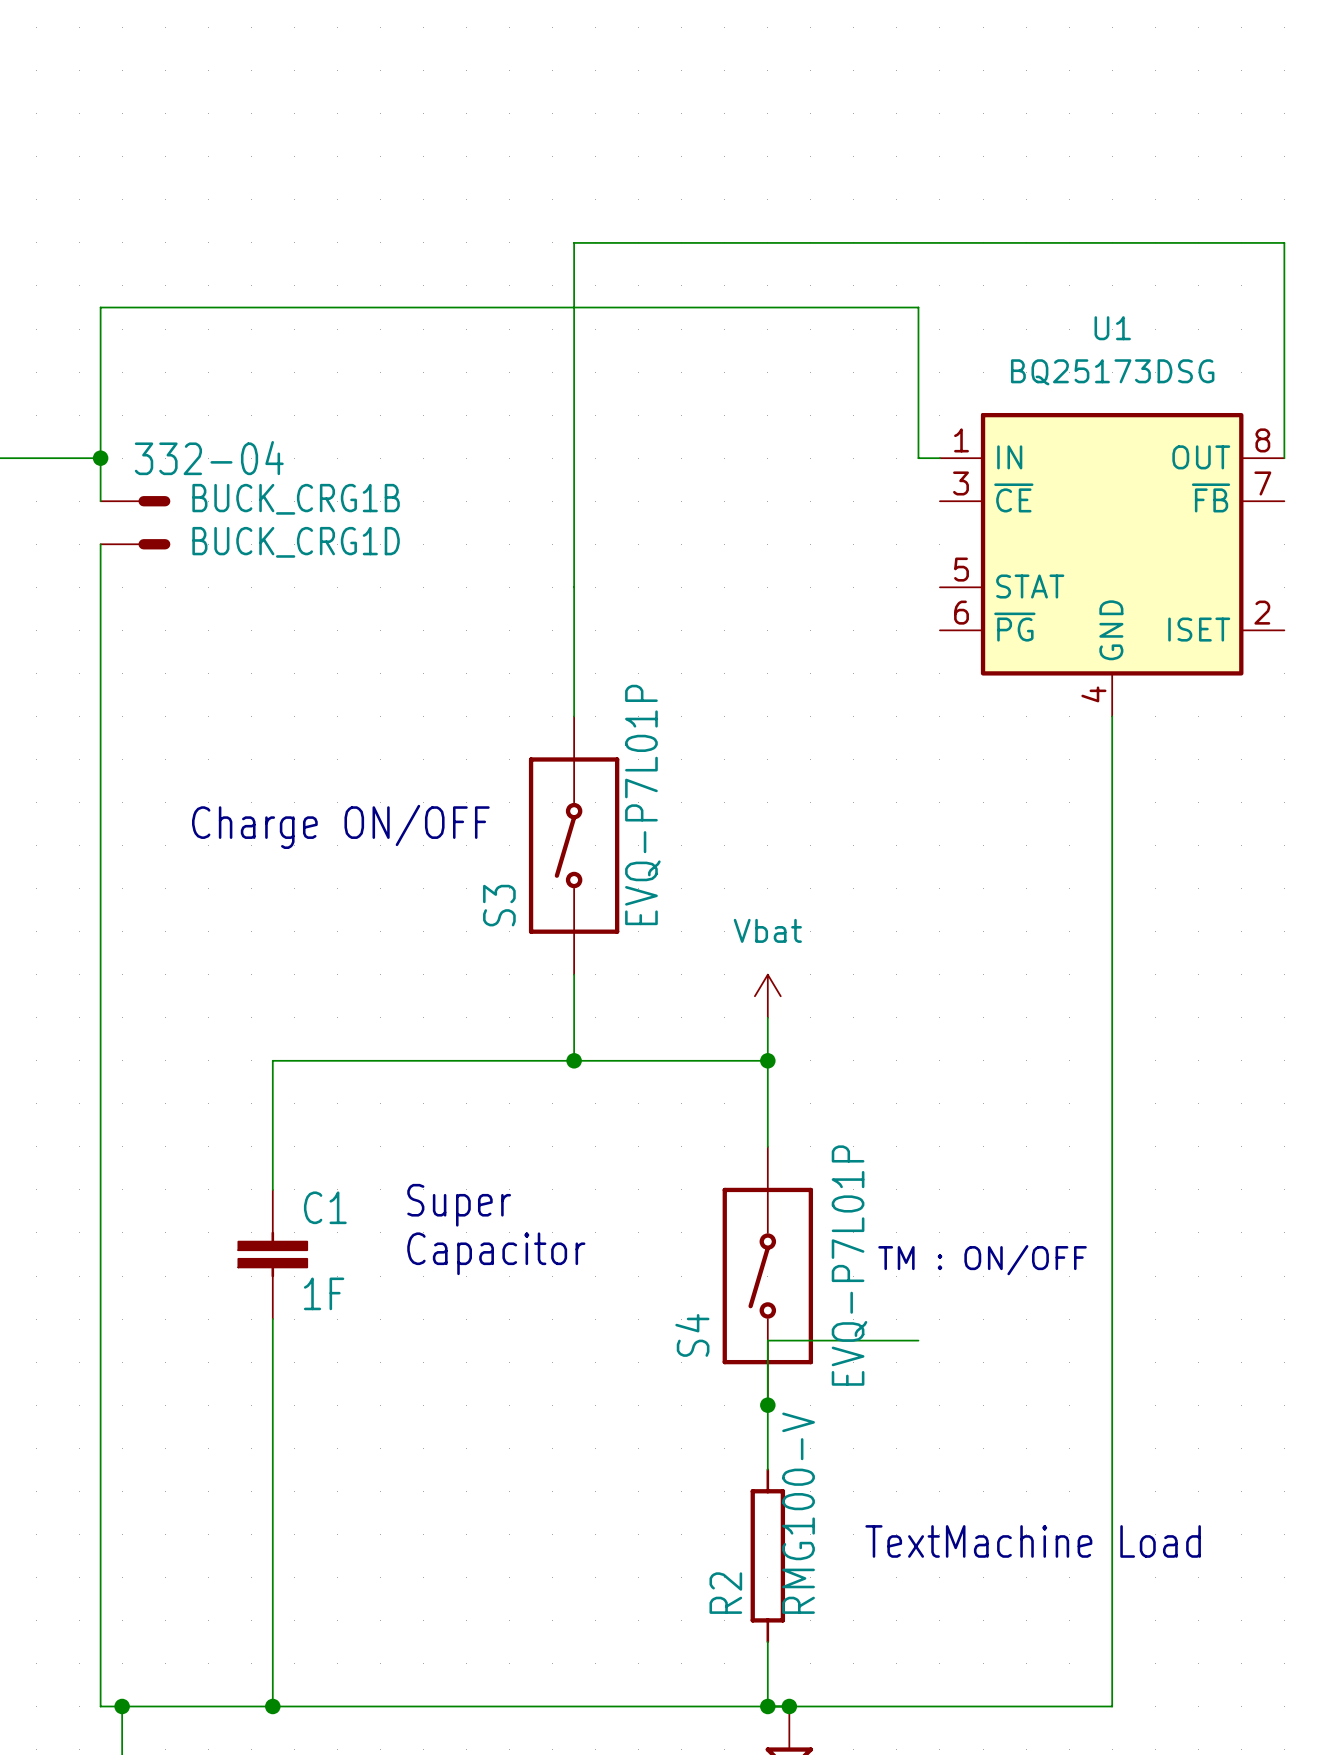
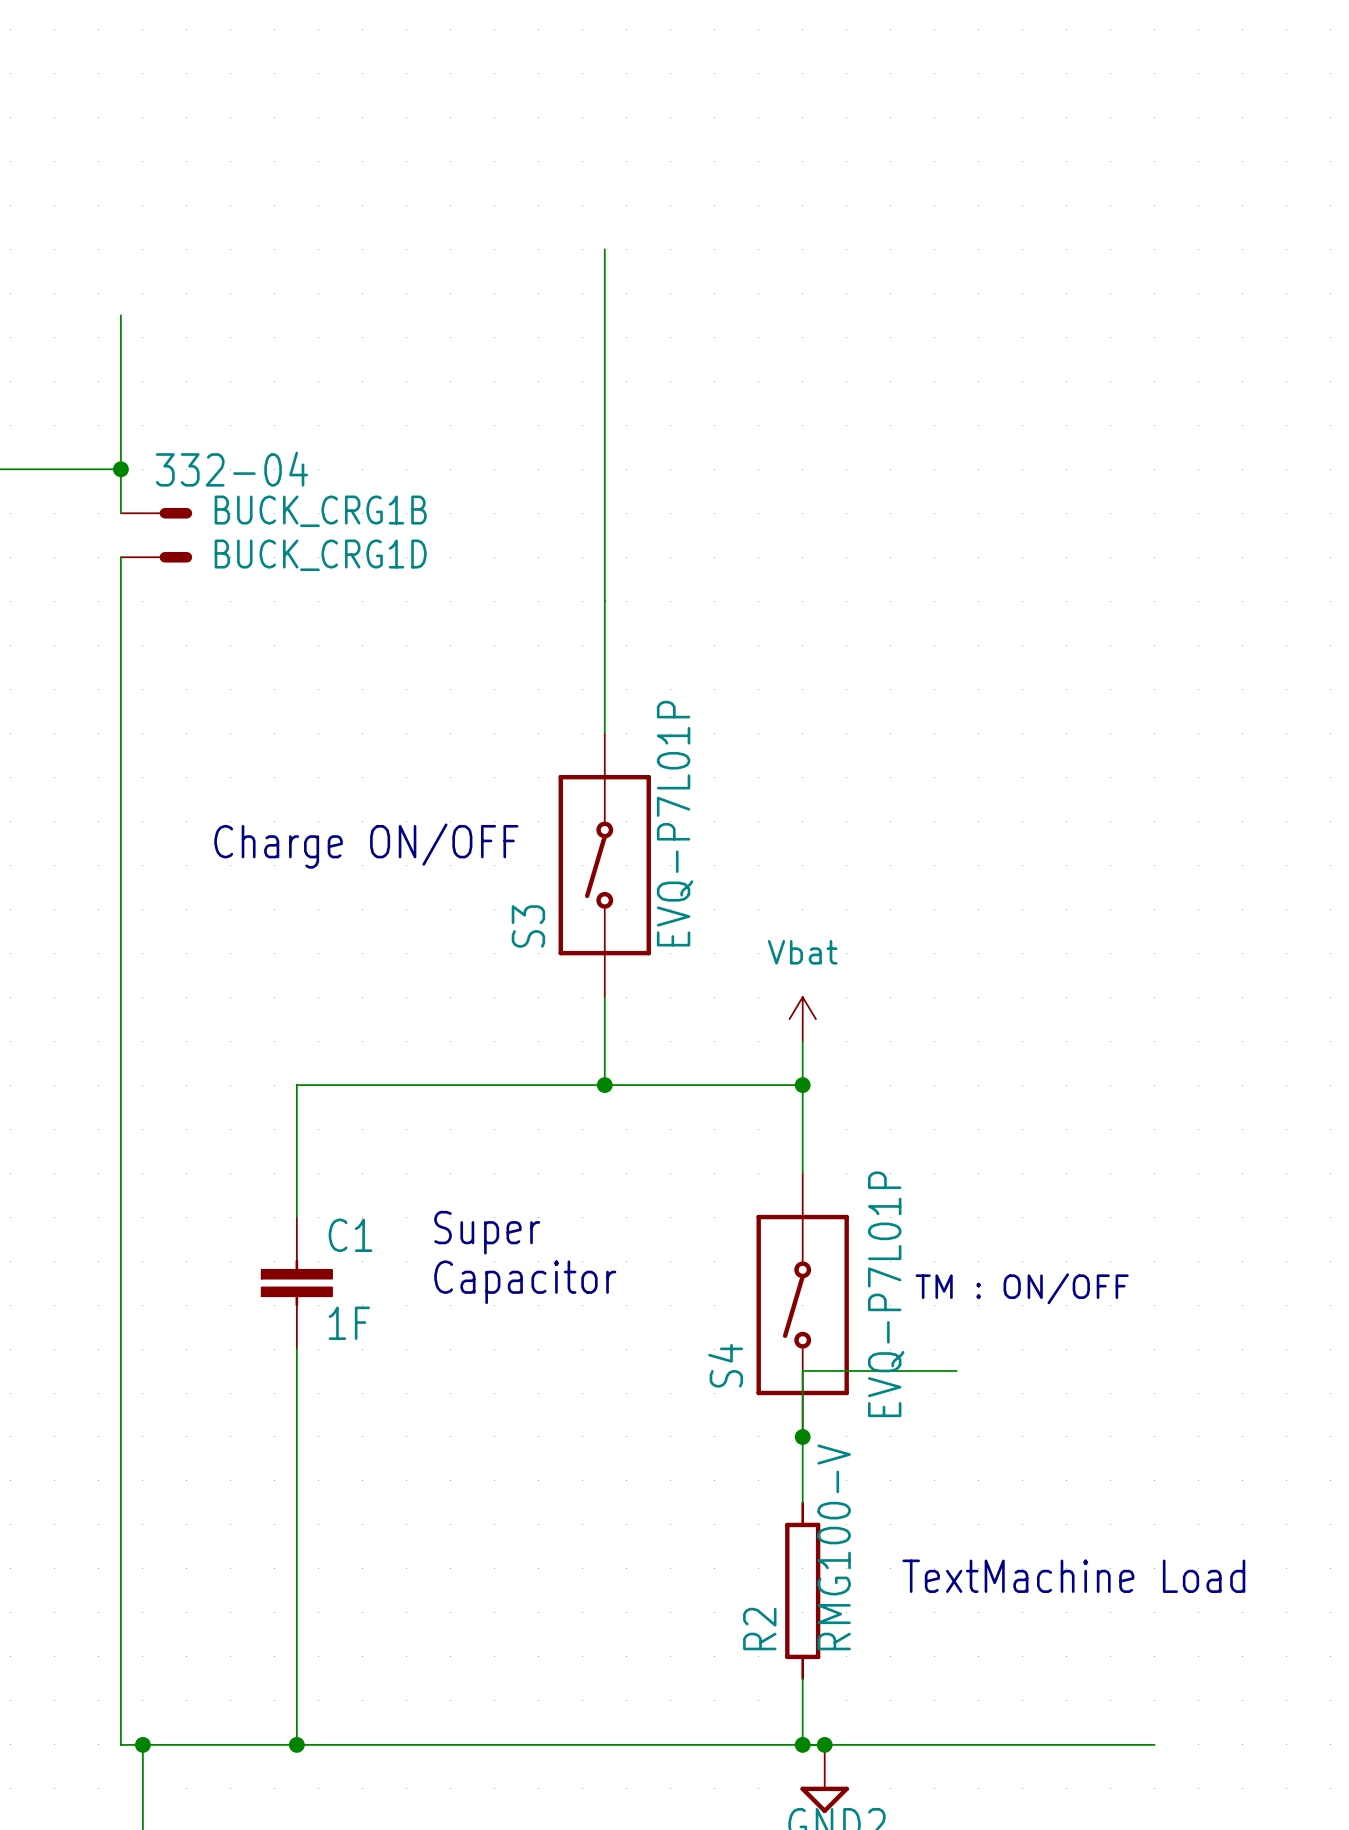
wire: (574, 242) (1284, 242) (1284, 458) -> none
wire: (100, 307) (918, 307) (918, 458) (939, 458) -> none
U1: BQ25173DSG (1112, 564) -> none
wire: (1112, 716) (1112, 1706) -> none

